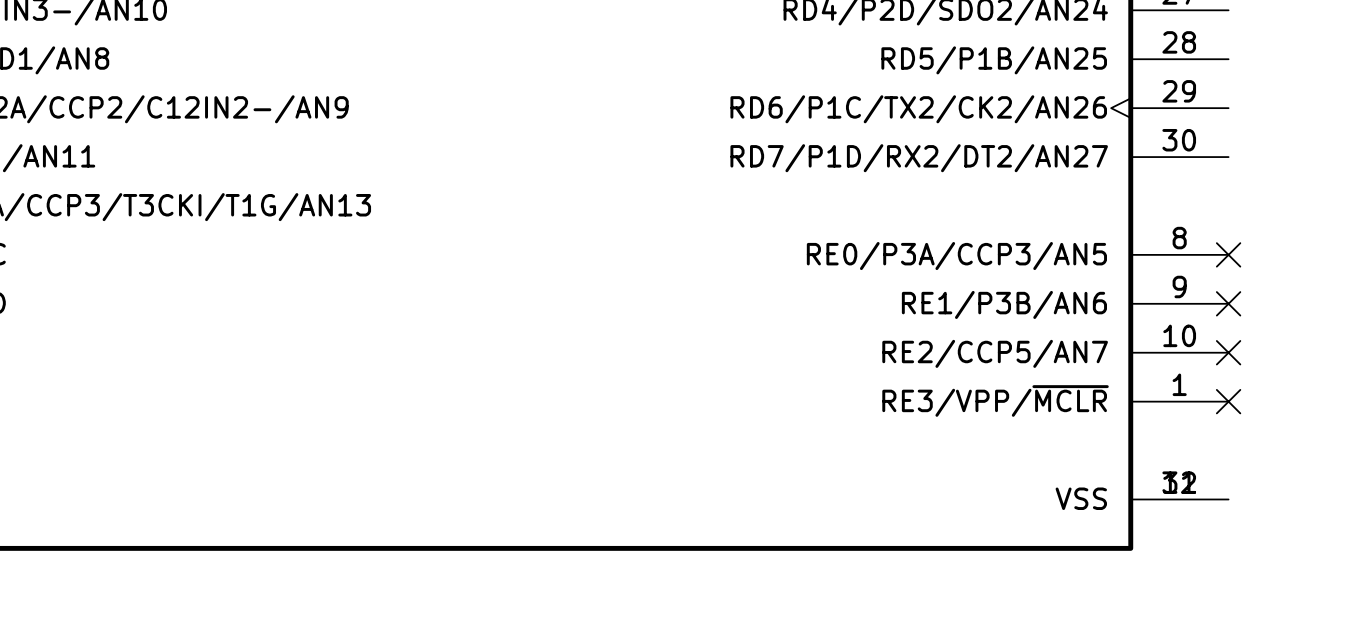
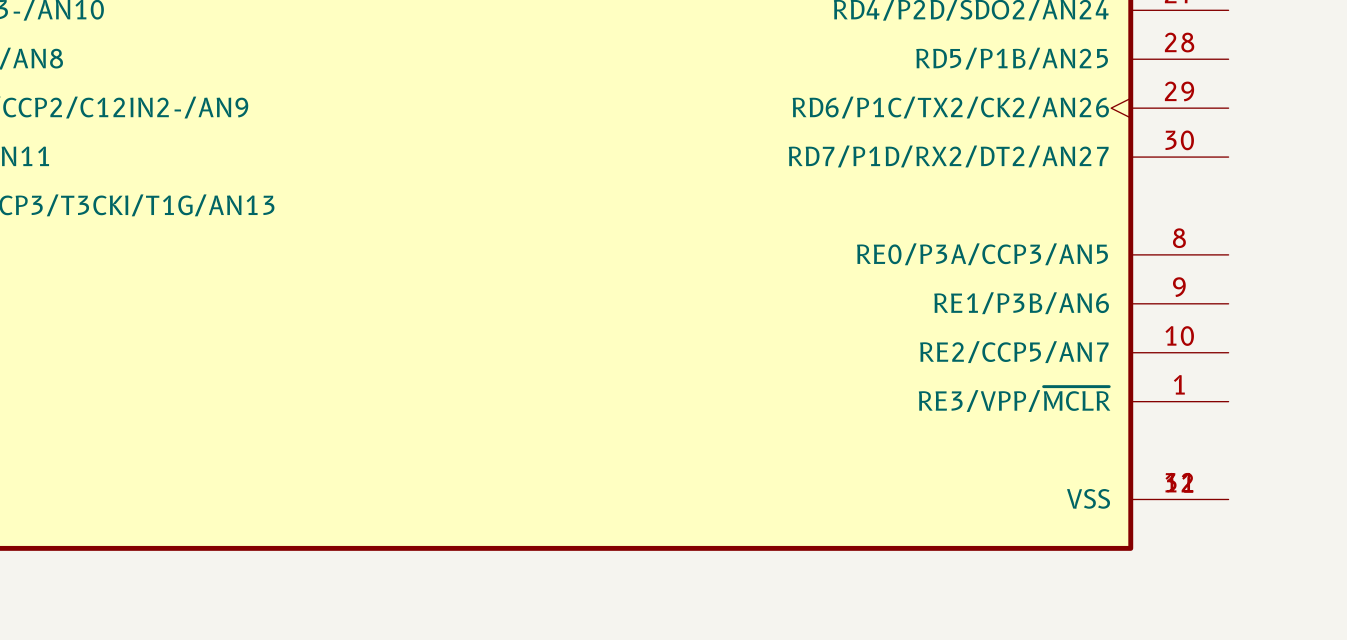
no-connect mark: (1228, 254) -> none
no-connect mark: (1228, 303) -> none
no-connect mark: (1228, 352) -> none
no-connect mark: (1228, 401) -> none

